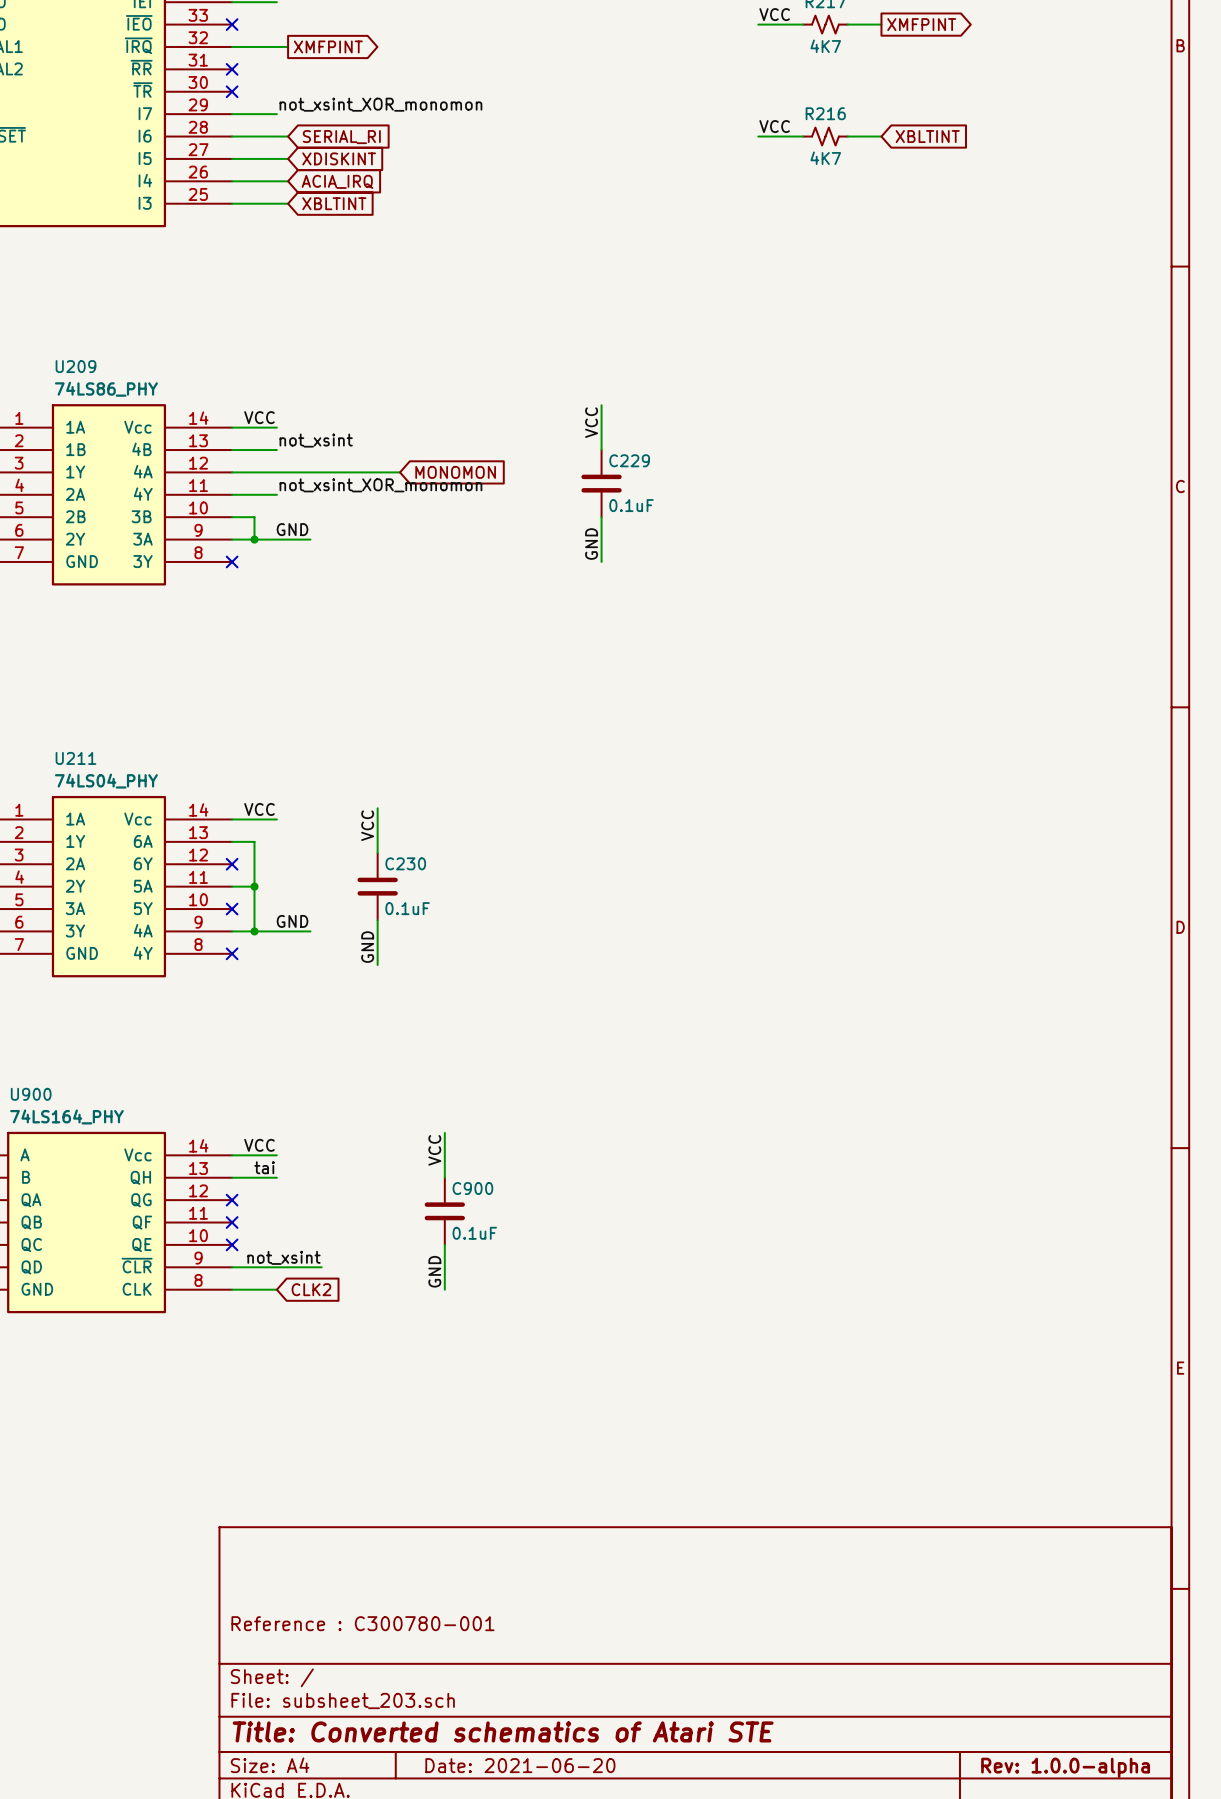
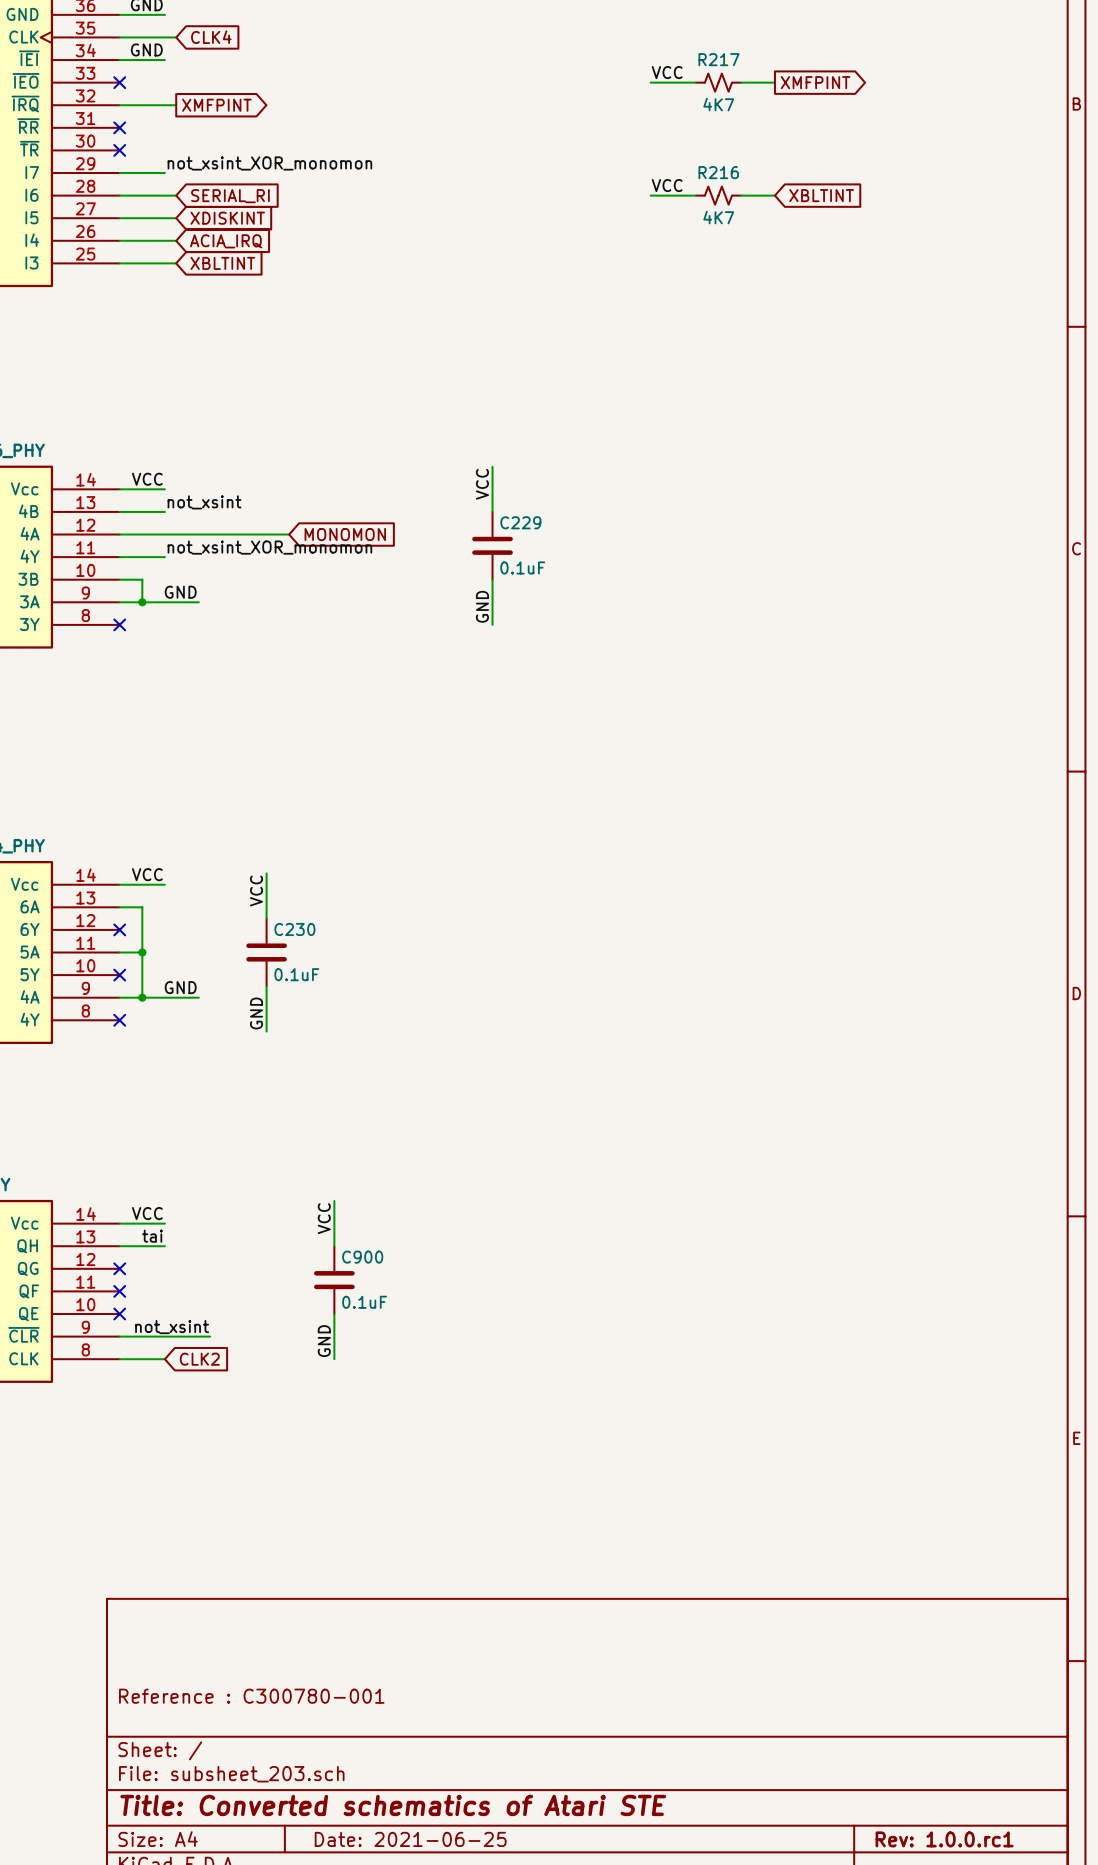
title block: Date: 2021-06-20 (520, 1765) -> Date: 2021-06-25 (410, 1839)
title block: Rev: 1.0.0-alpha (1065, 1767) -> Rev: 1.0.0.rc1 (944, 1839)

